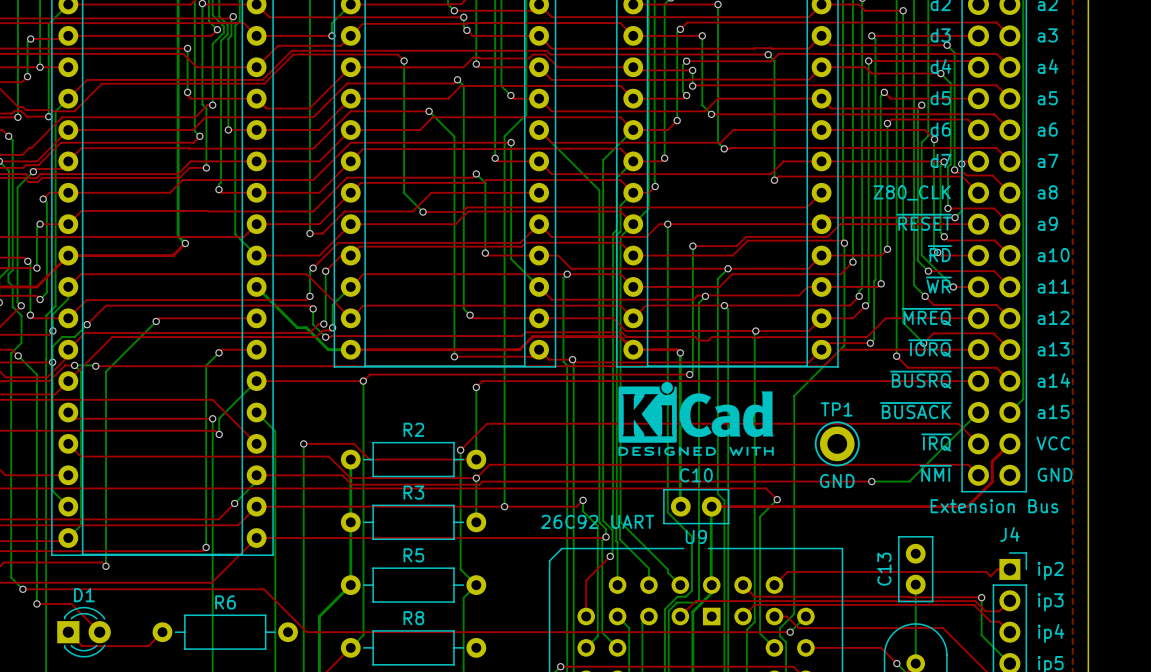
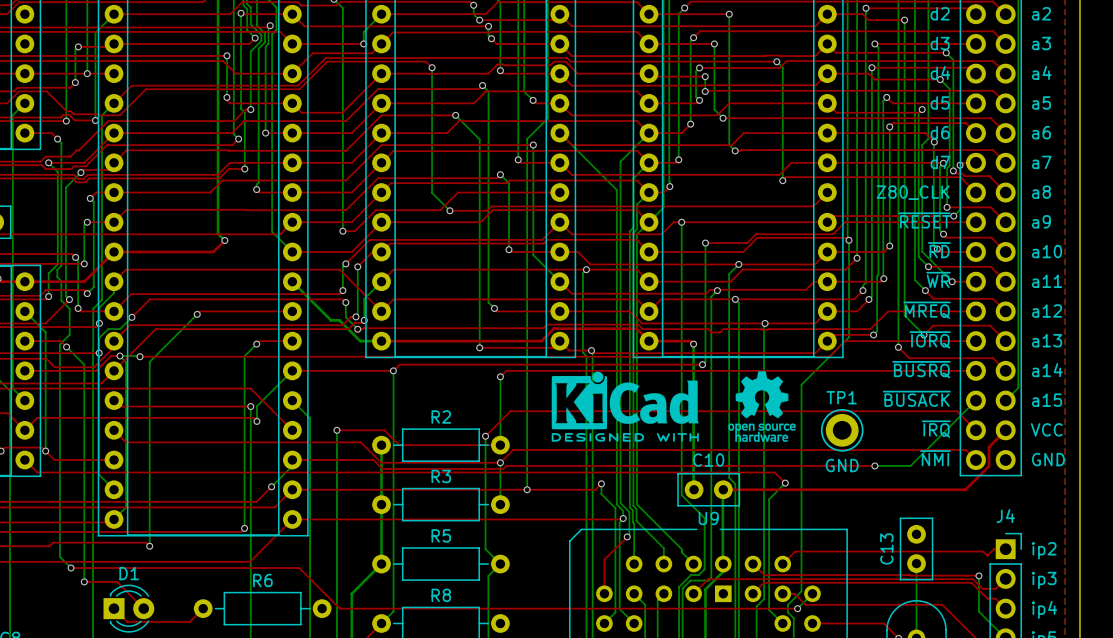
drawing: none -> [728, 371, 796, 442]
drawing position: (696, 418) -> (625, 406)
text: Extension Bus (994, 506) -> none
text: 26C92 UART (597, 521) -> none

